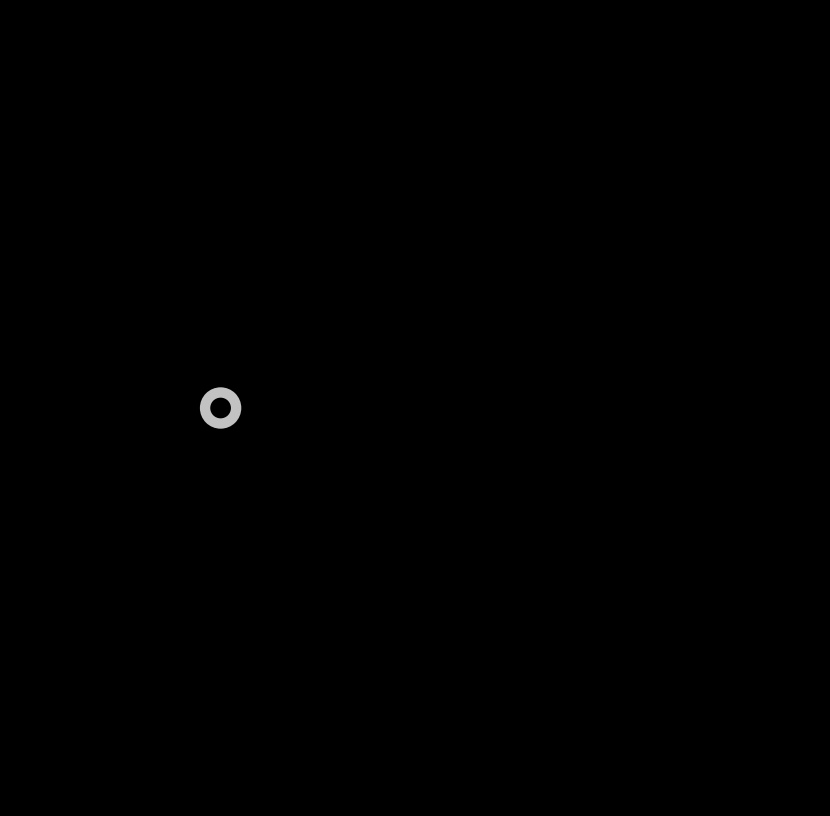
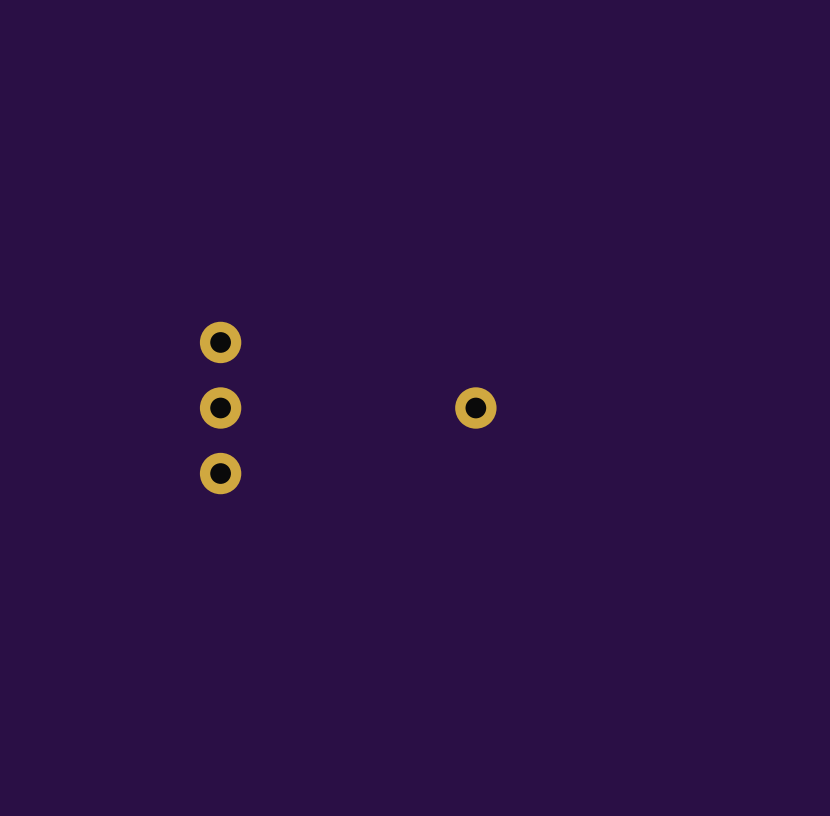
via: none -> (220, 342)
via: none -> (475, 408)
via: none -> (220, 473)

